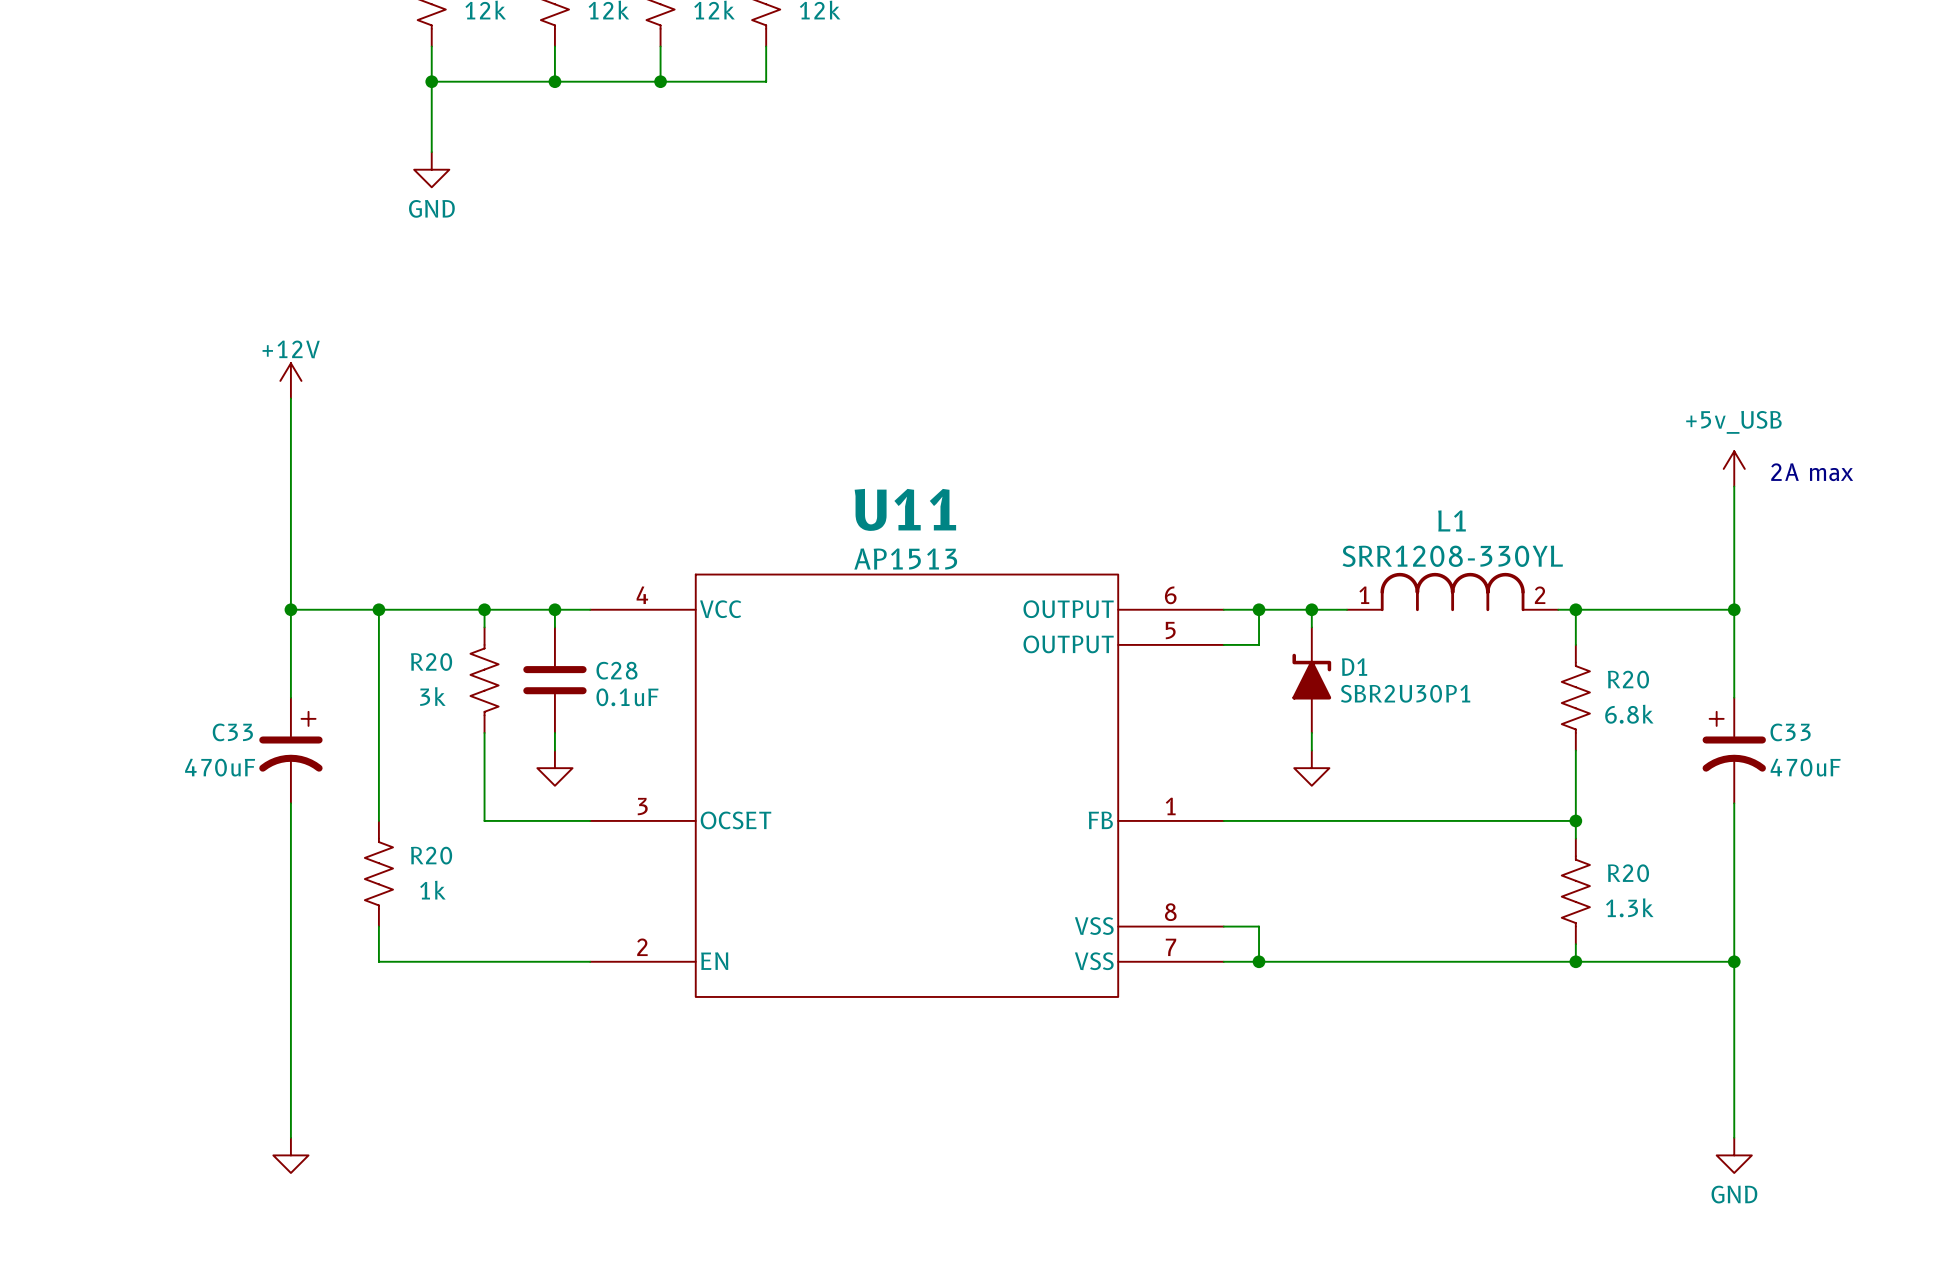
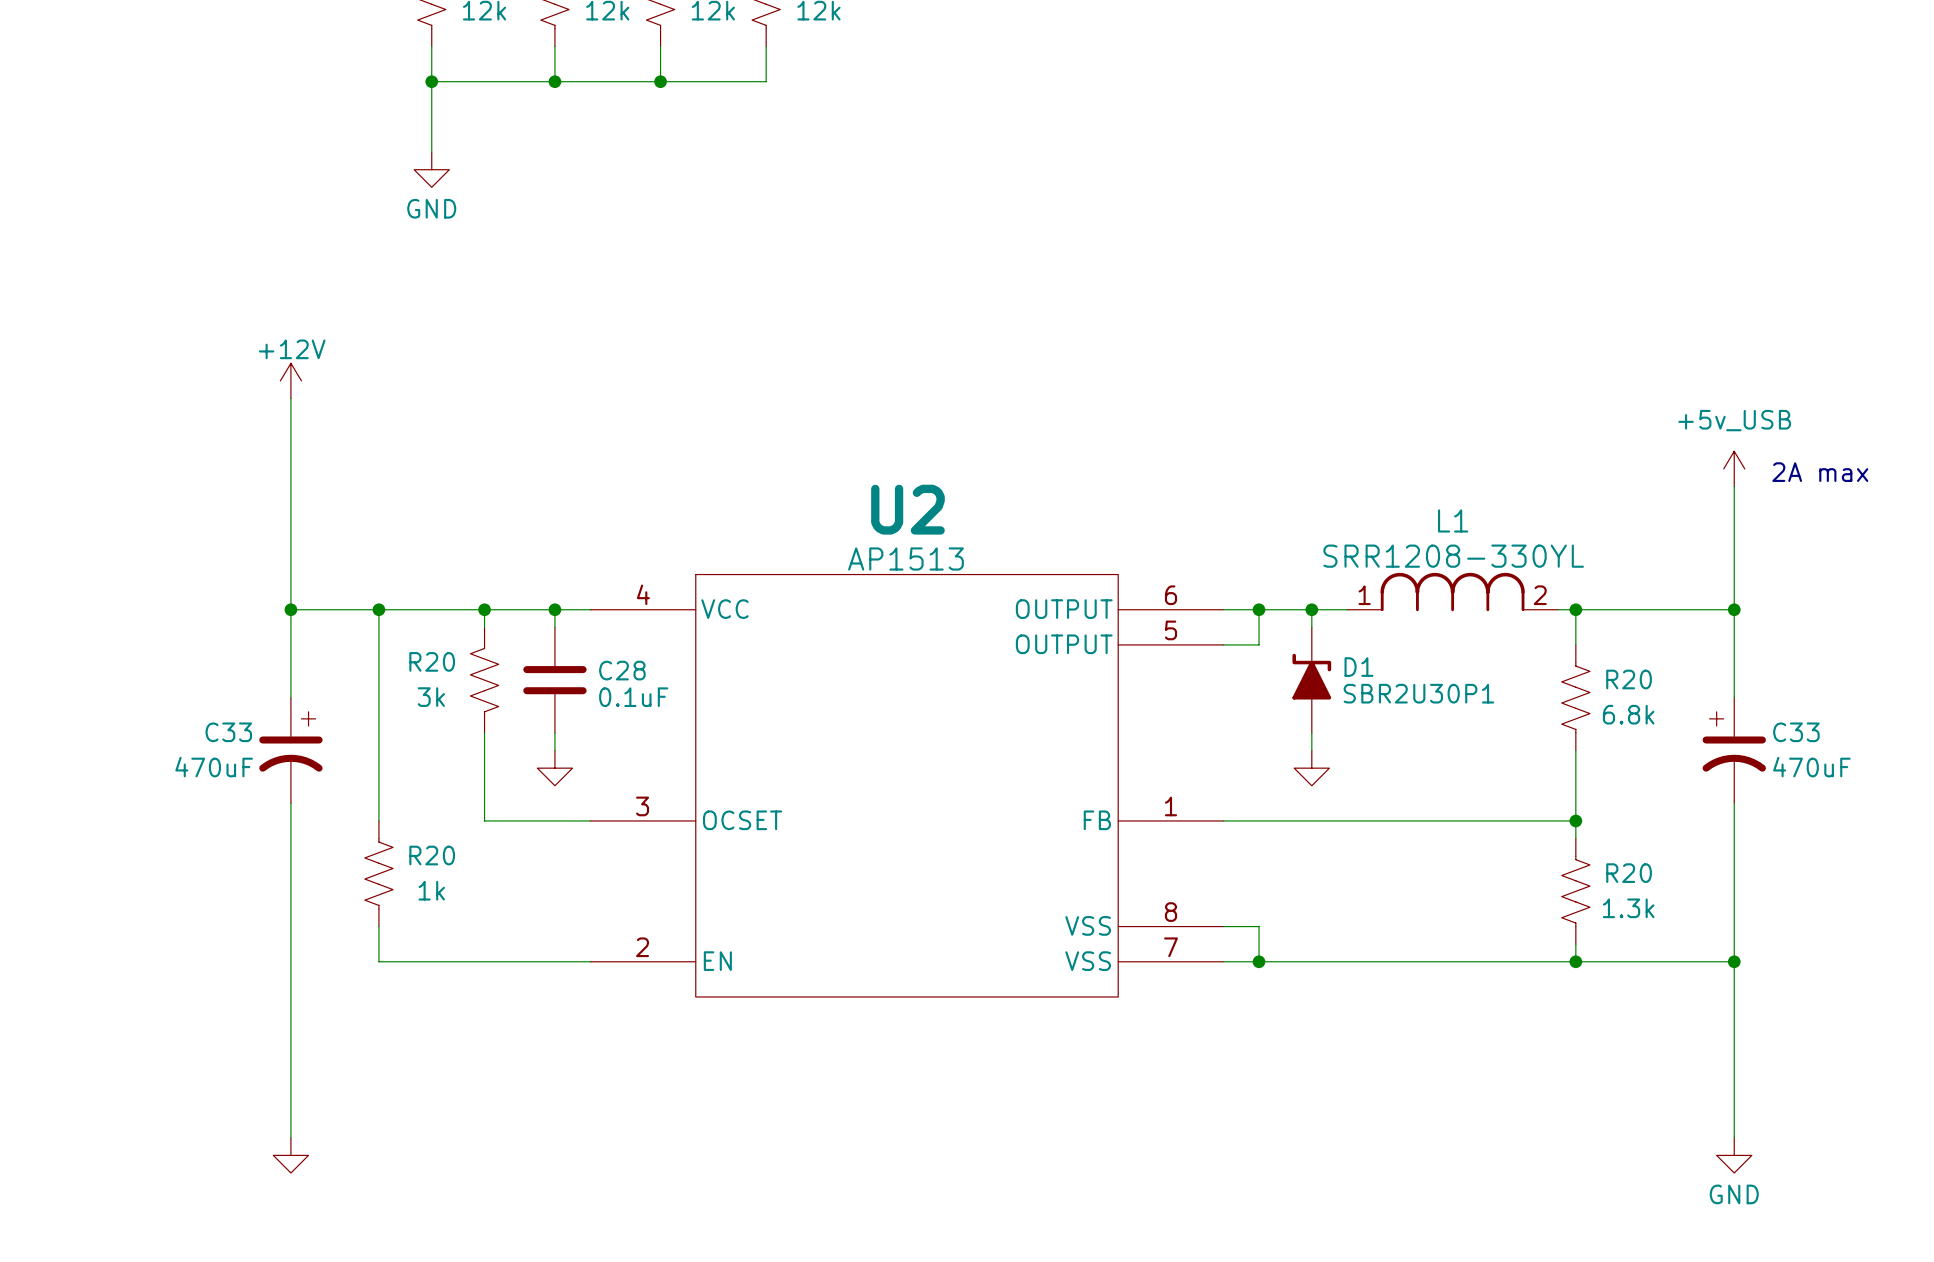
U11 name: U11 (905, 509) -> U2 (907, 509)

